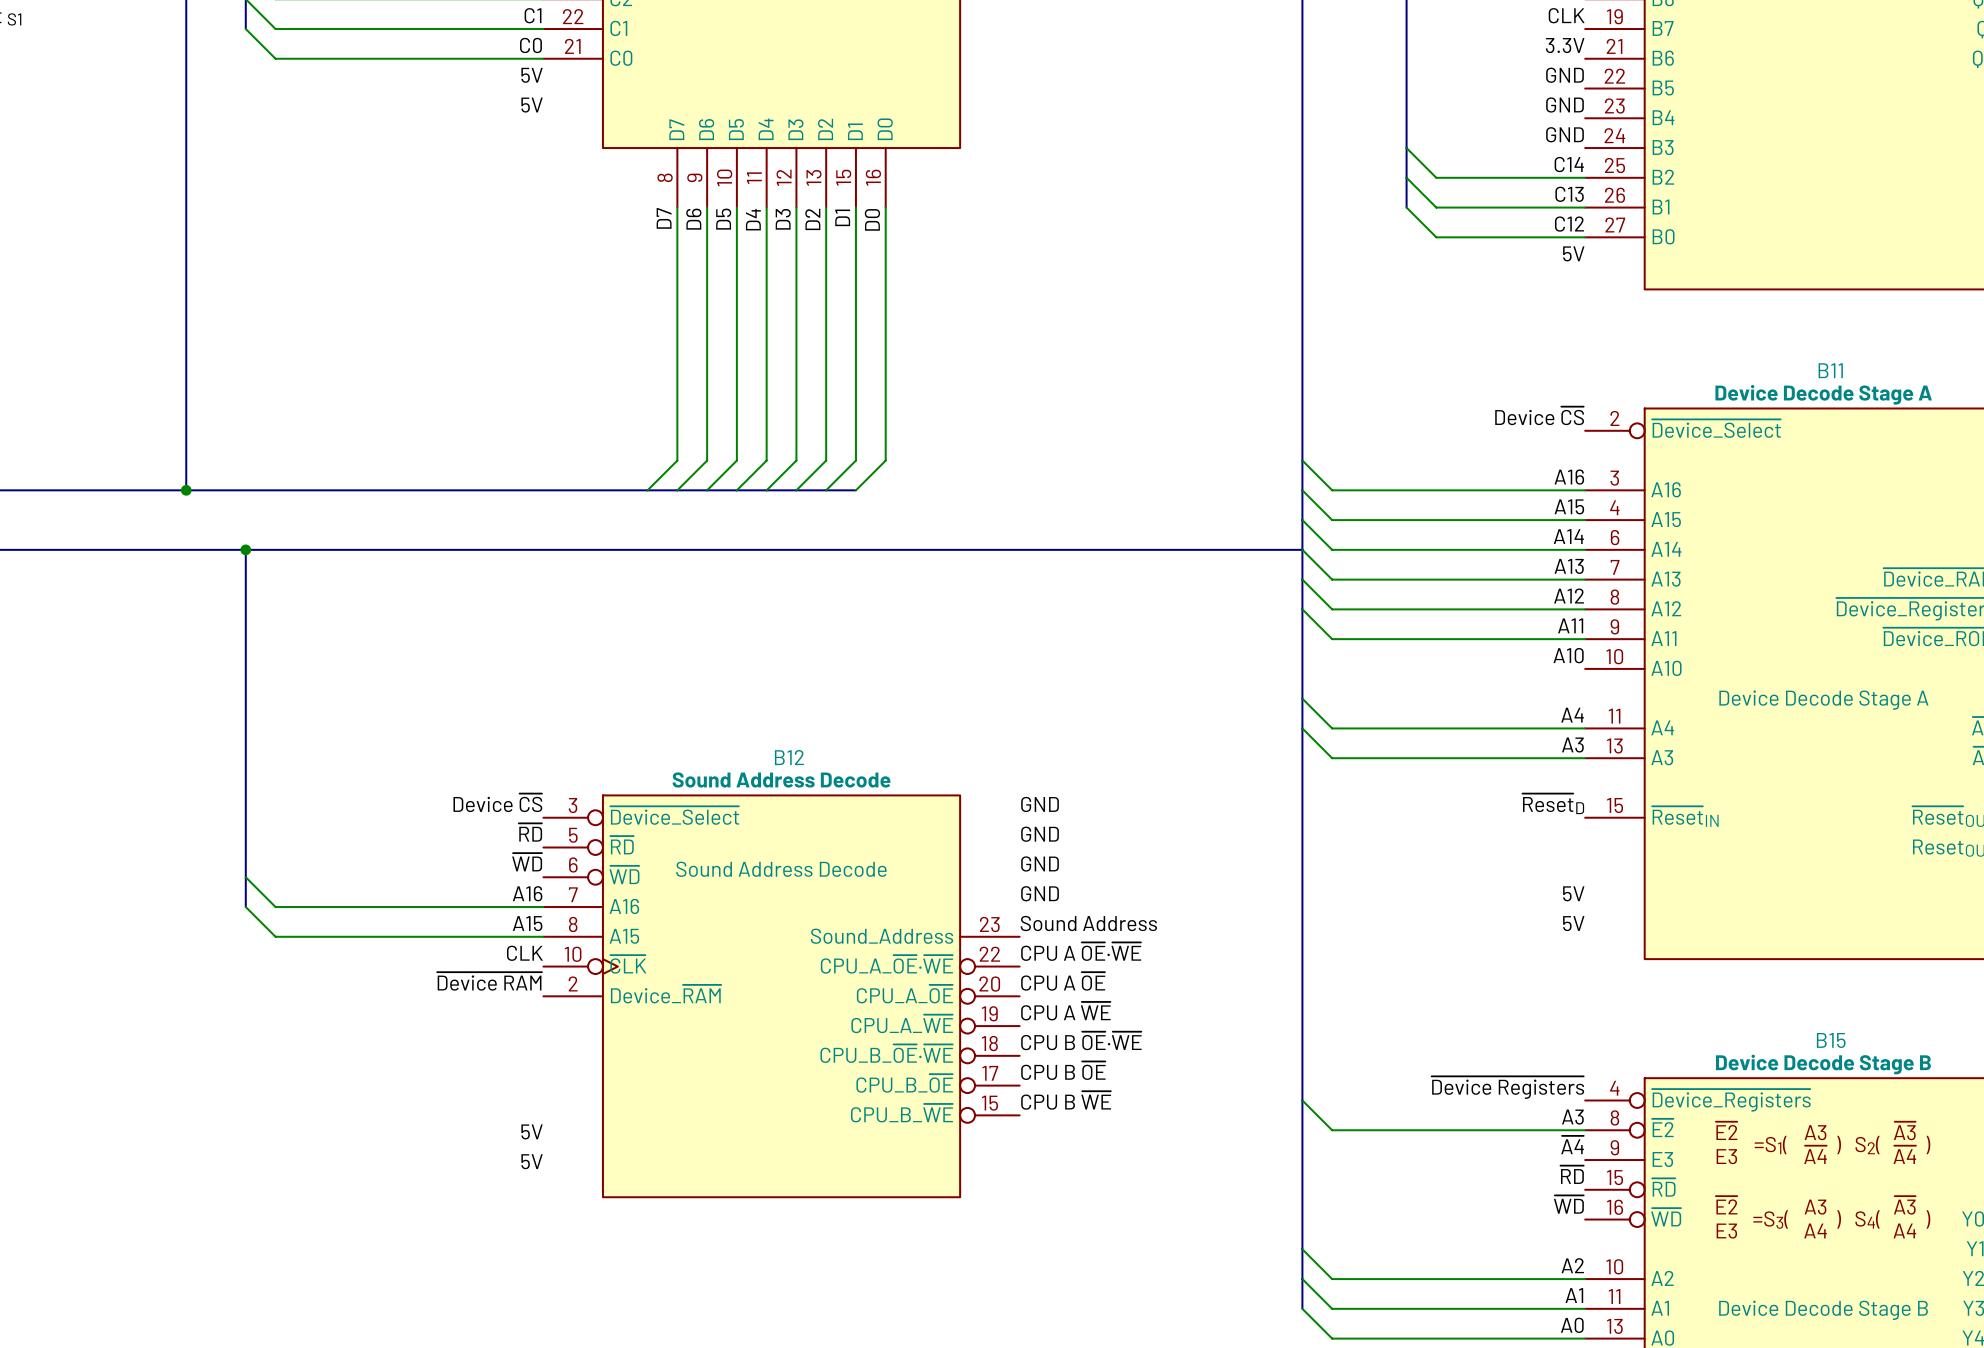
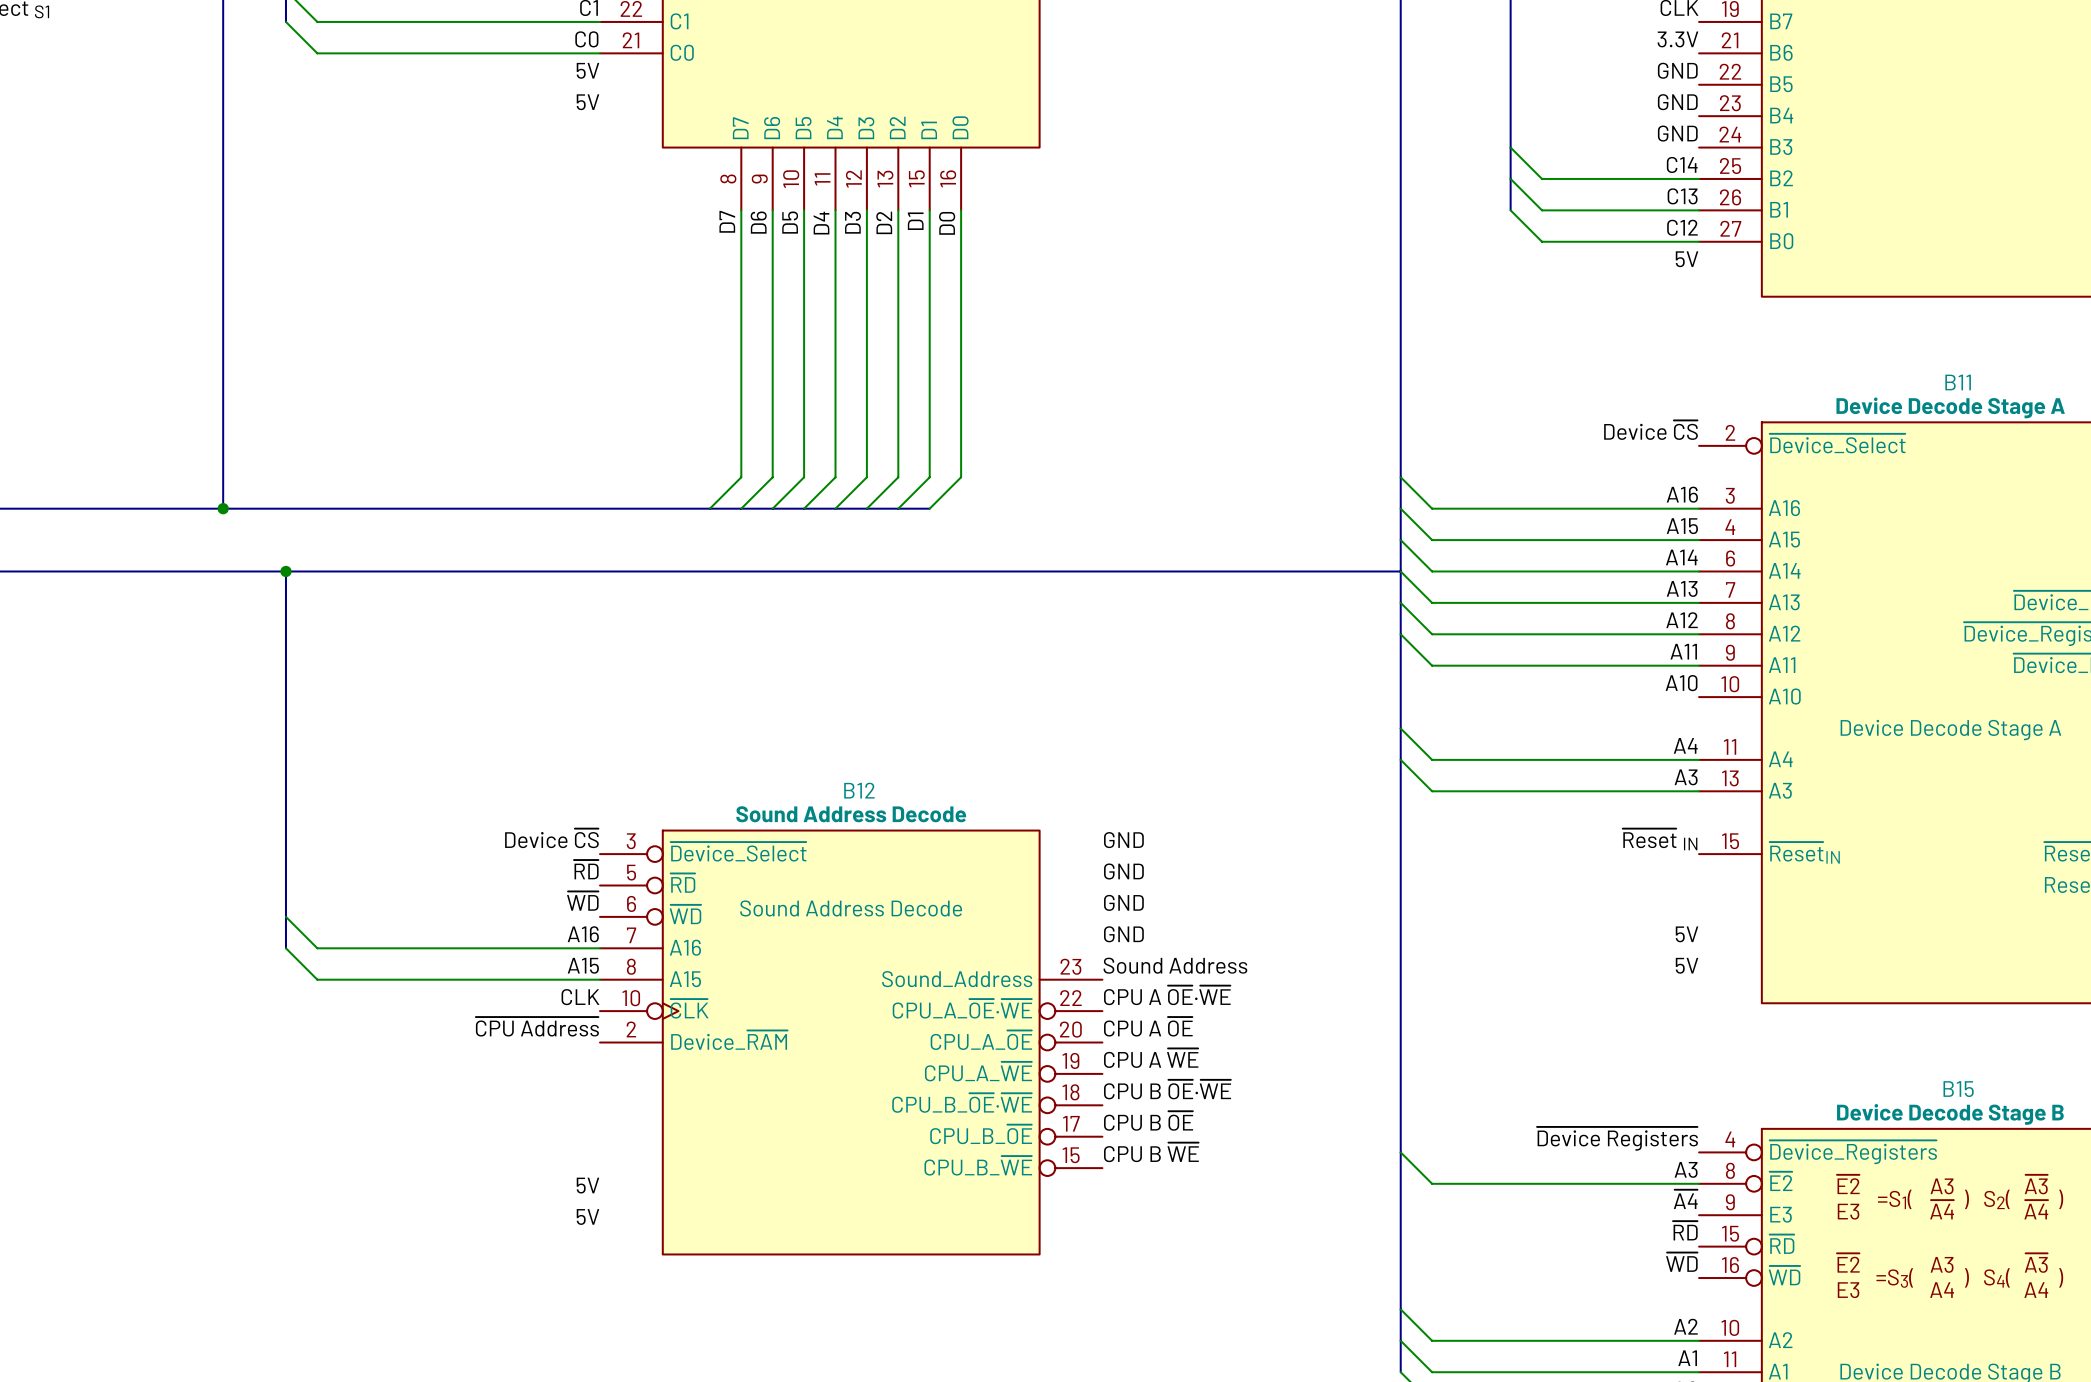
label: ~{Reset}D (1553, 803) -> ~{Reset} IN (1660, 839)
label: ~{Device RAM} (489, 981) -> ~{CPU Address} (537, 1026)

